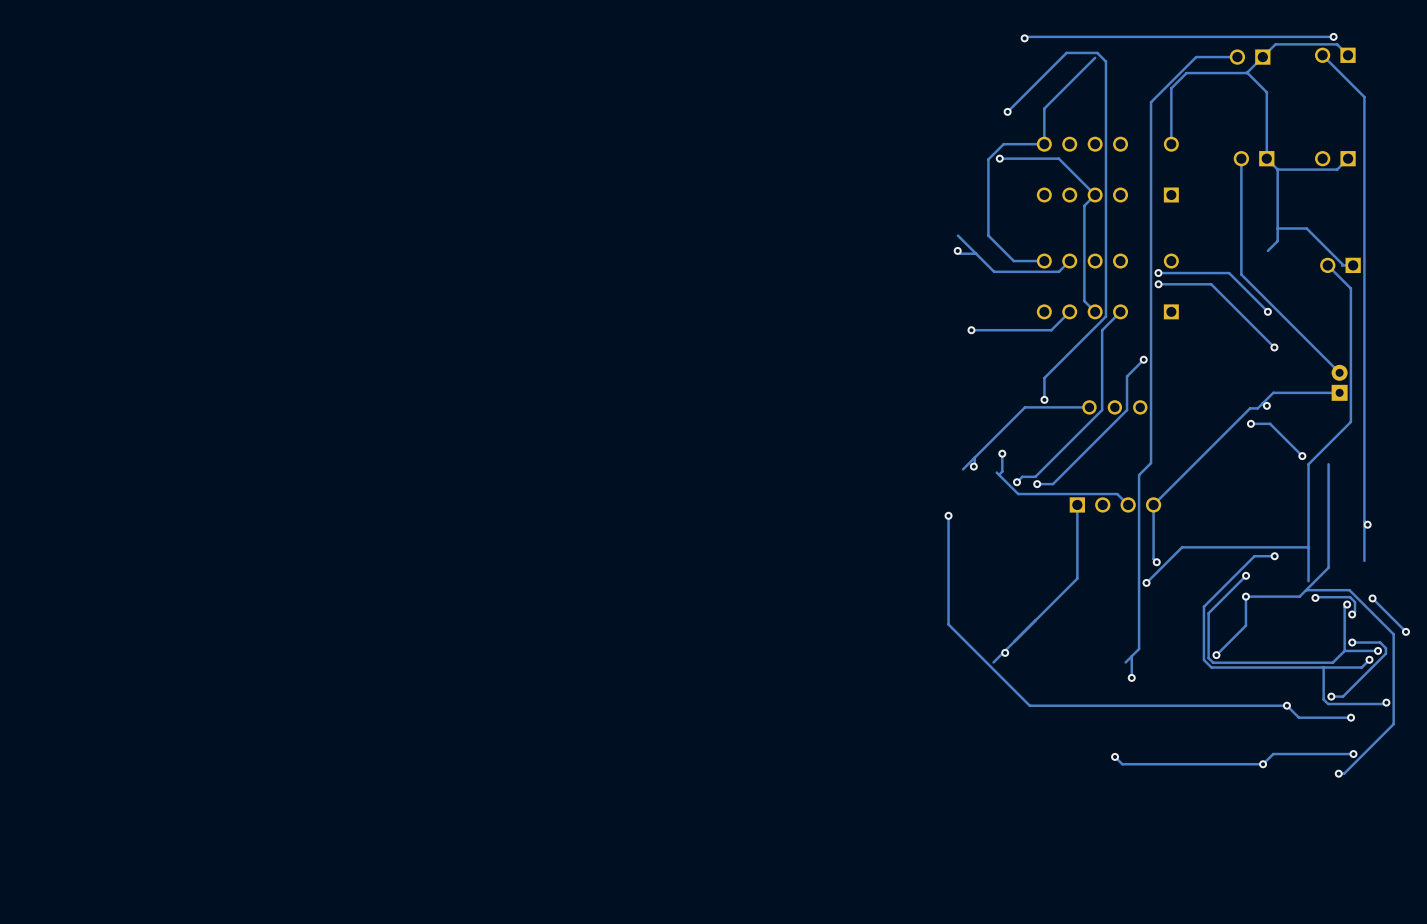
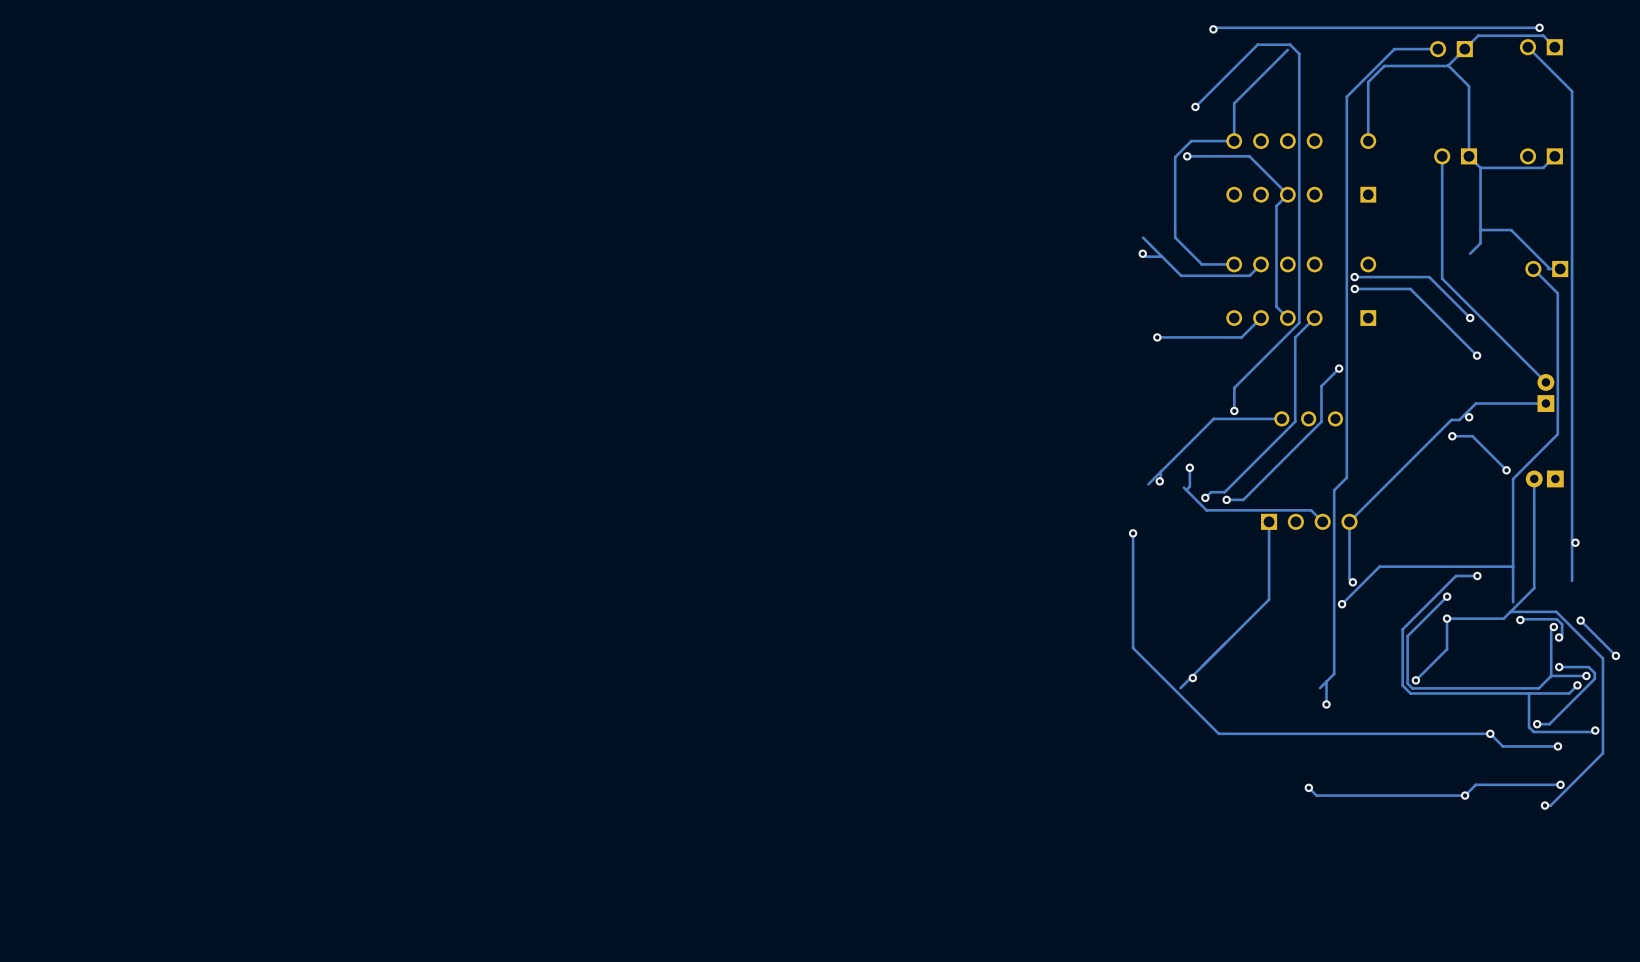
part: none -> (1544, 478)

